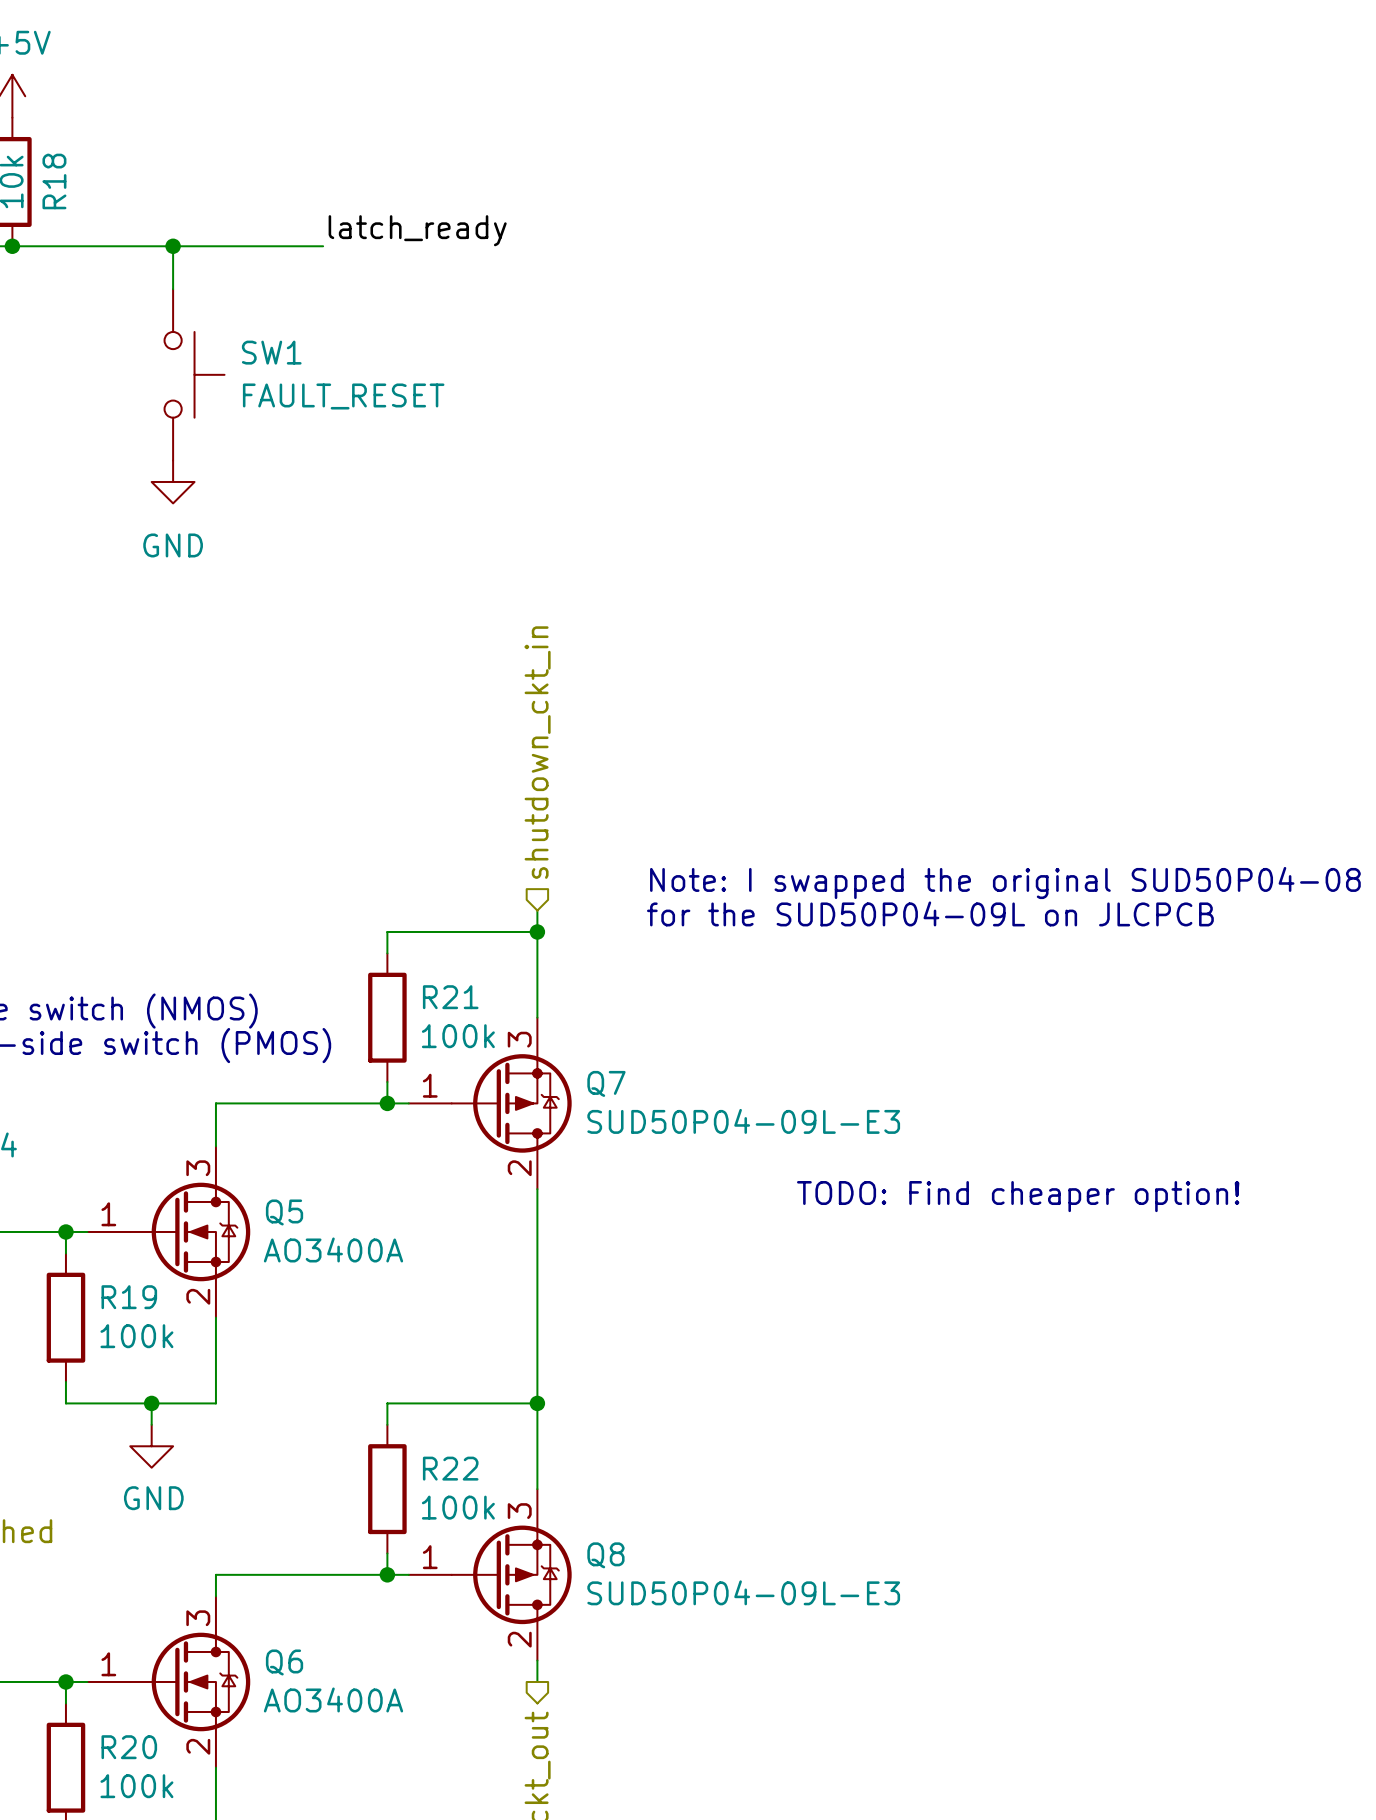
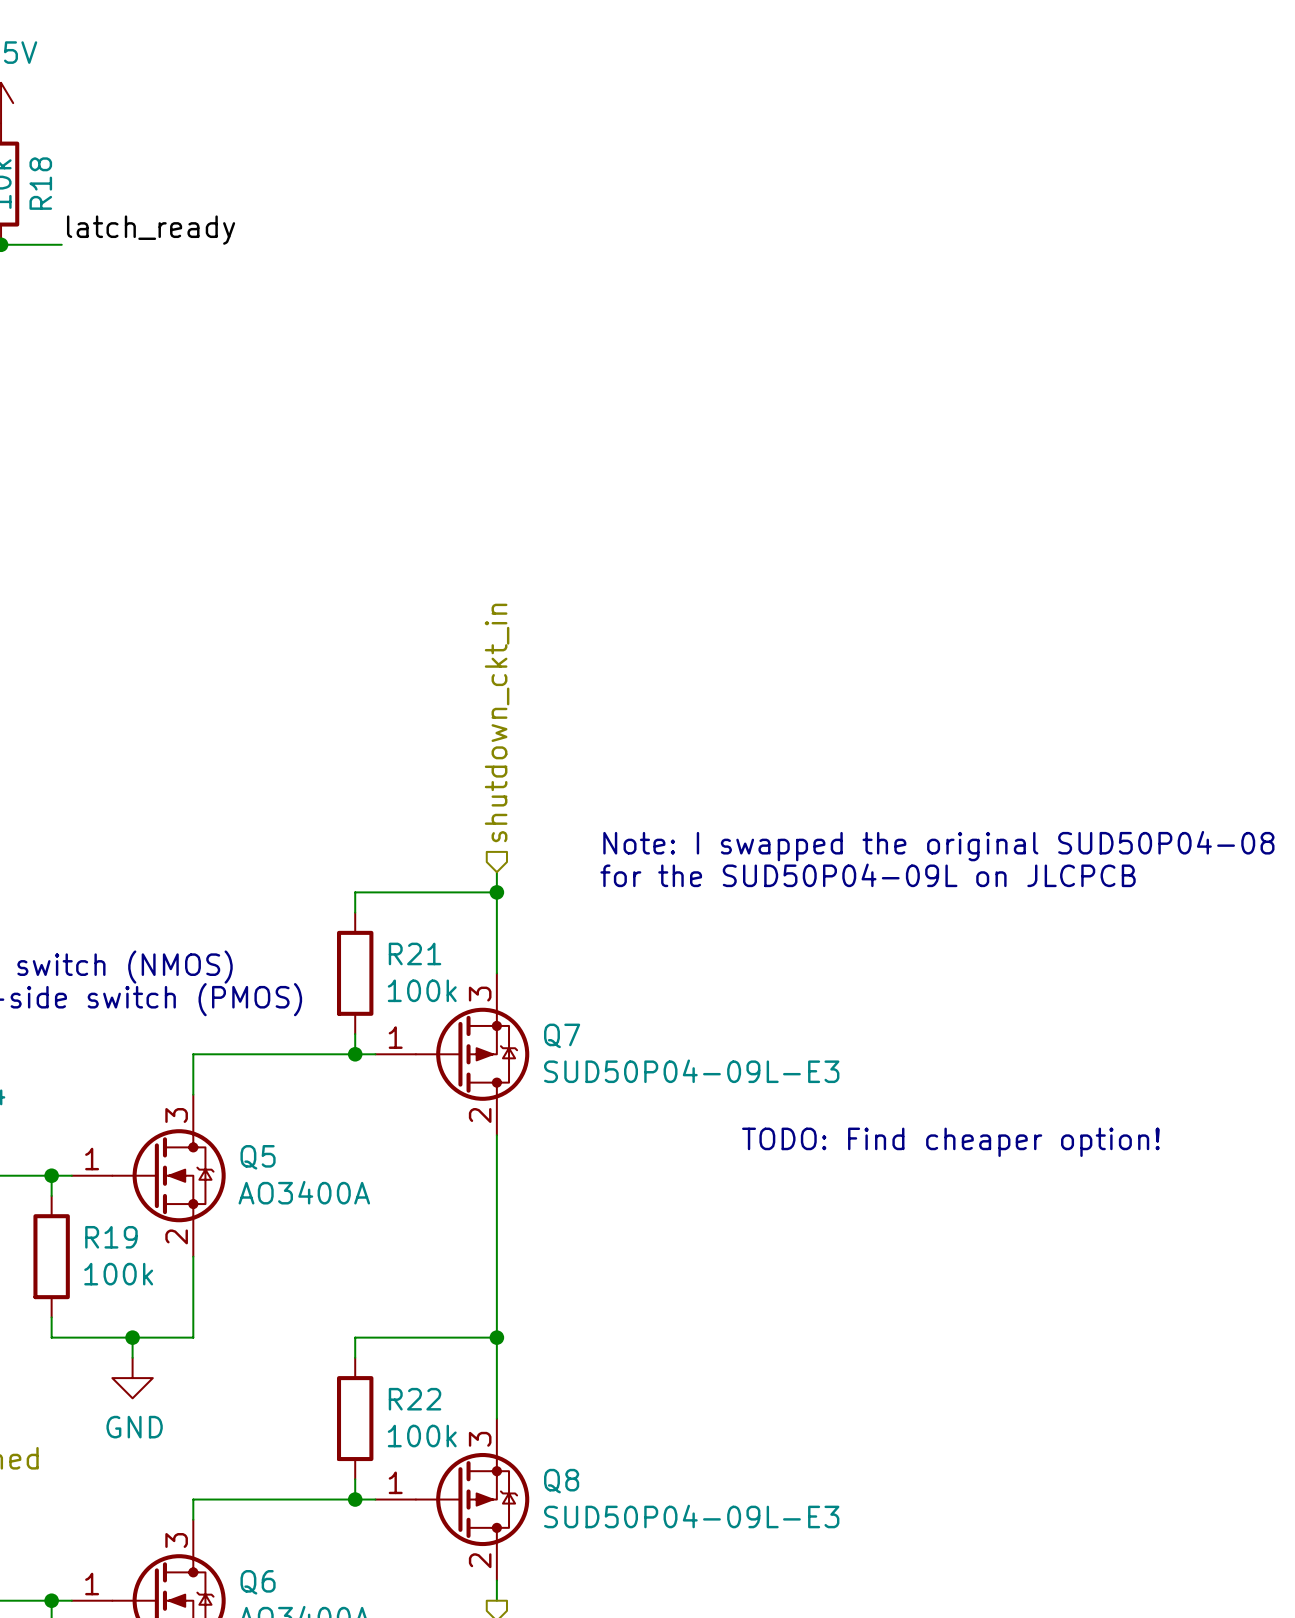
label position: latch_ready (417, 230) -> latch_ready (151, 230)
wire: (76, 246) (323, 246) -> none
wire: (173, 246) (173, 289) -> none
junction: (173, 246) -> none
SW1: FAULT_RESET (194, 374) -> none
power symbol: GND (173, 481) -> none

